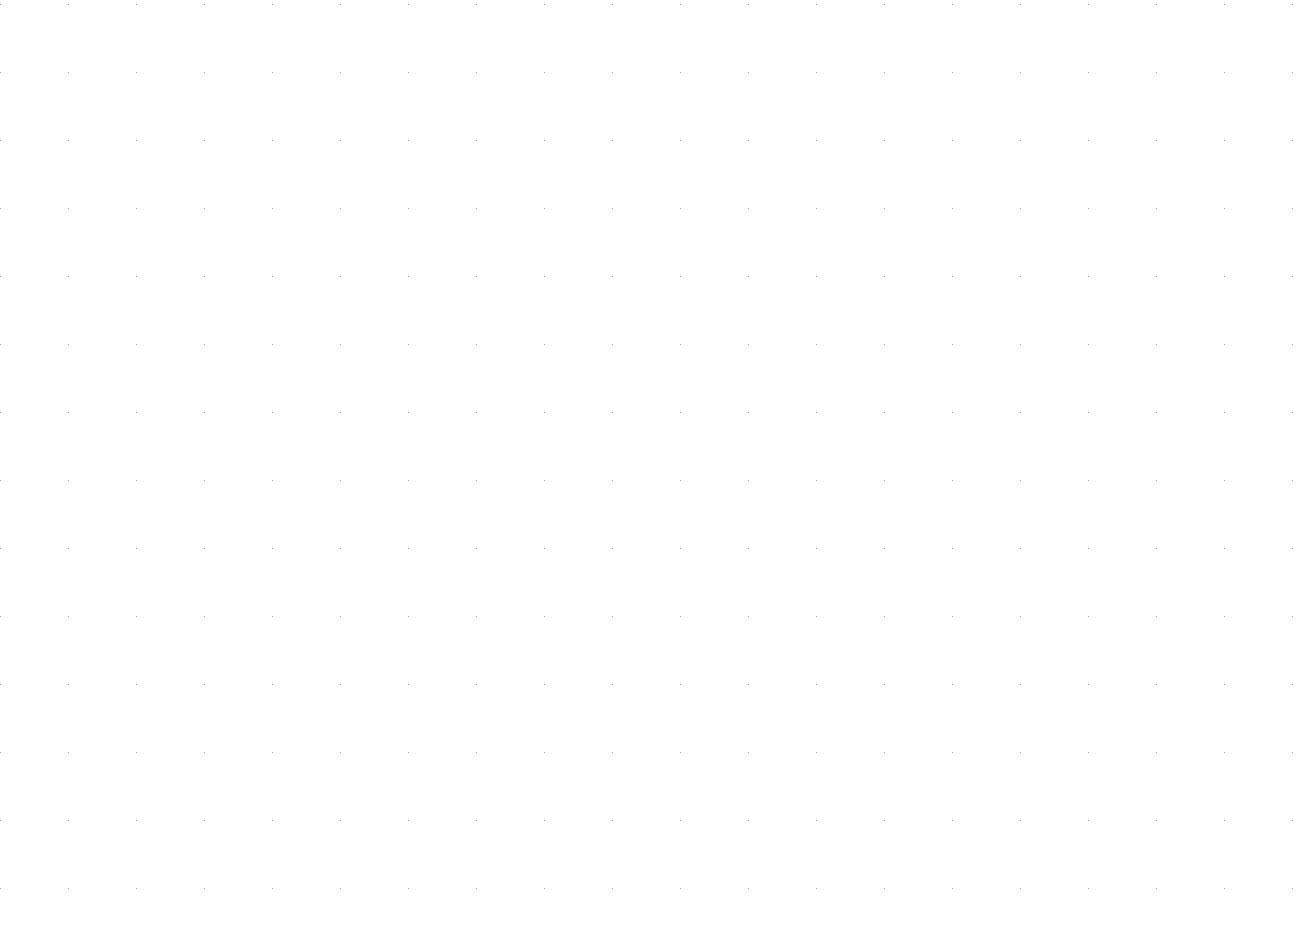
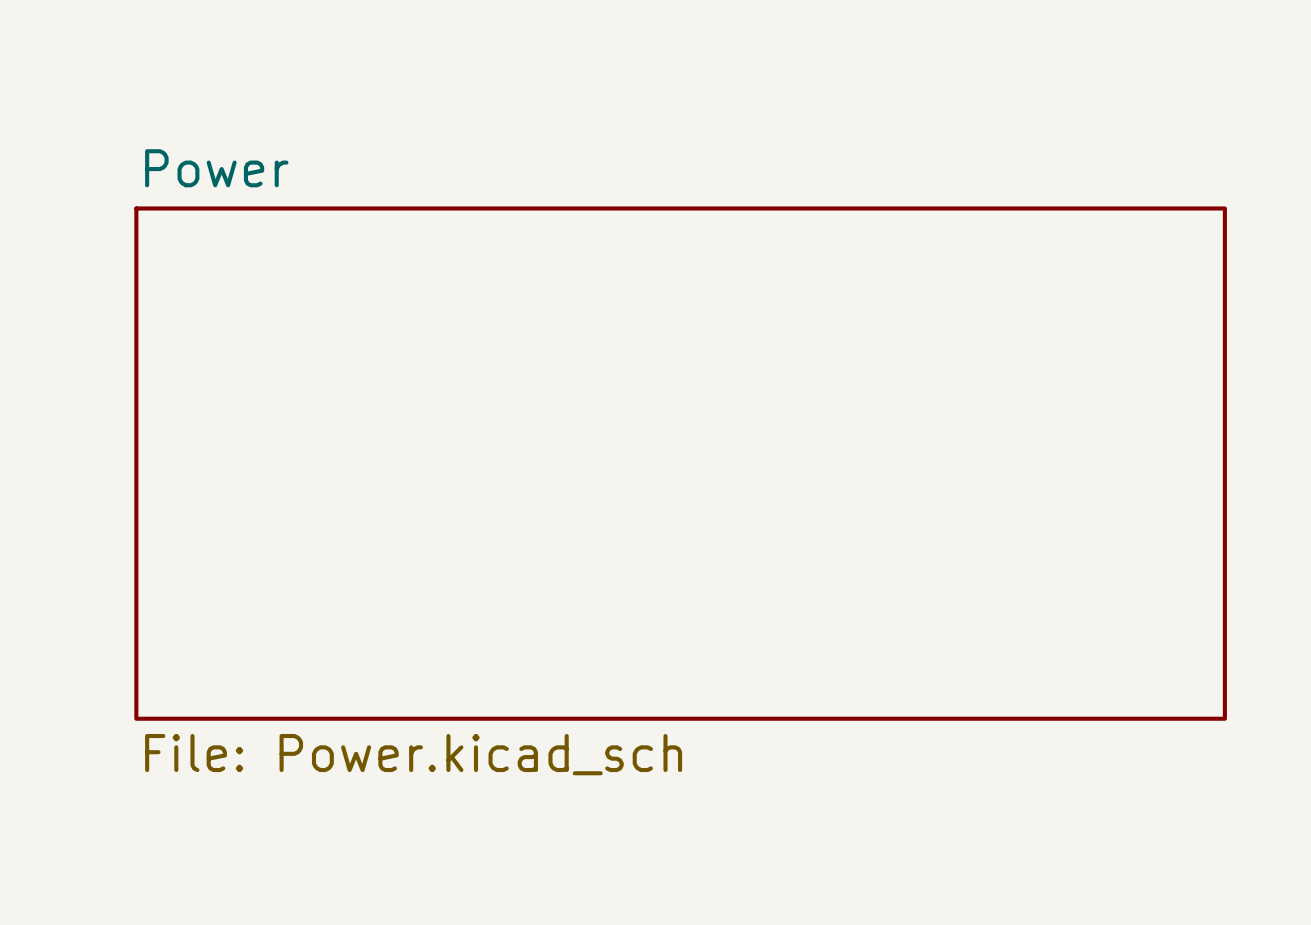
sheet Power: none -> File: Power.kicad_sch (680, 463)

